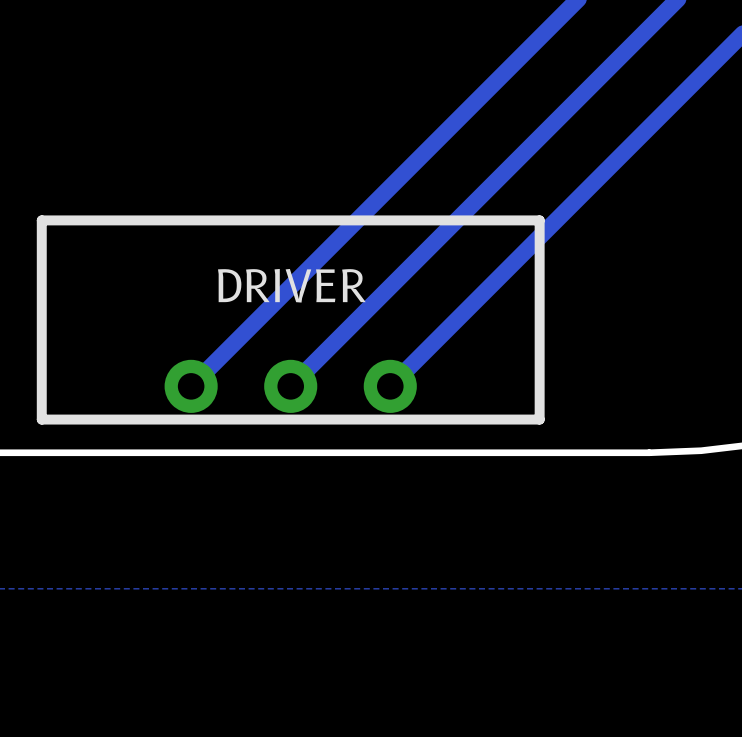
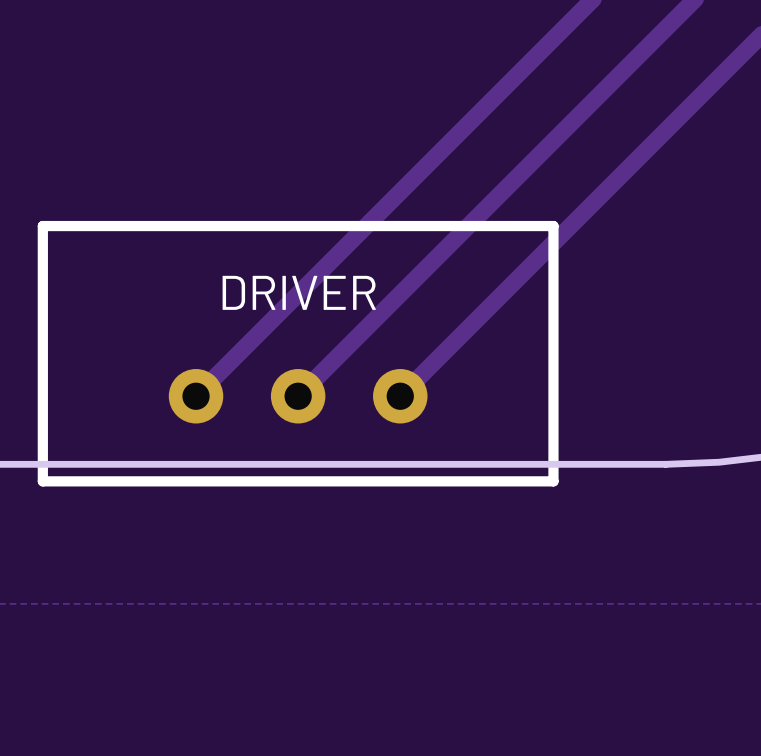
line: (539, 419) (41, 419) -> (553, 430) (553, 481) (42, 481) (42, 430)

